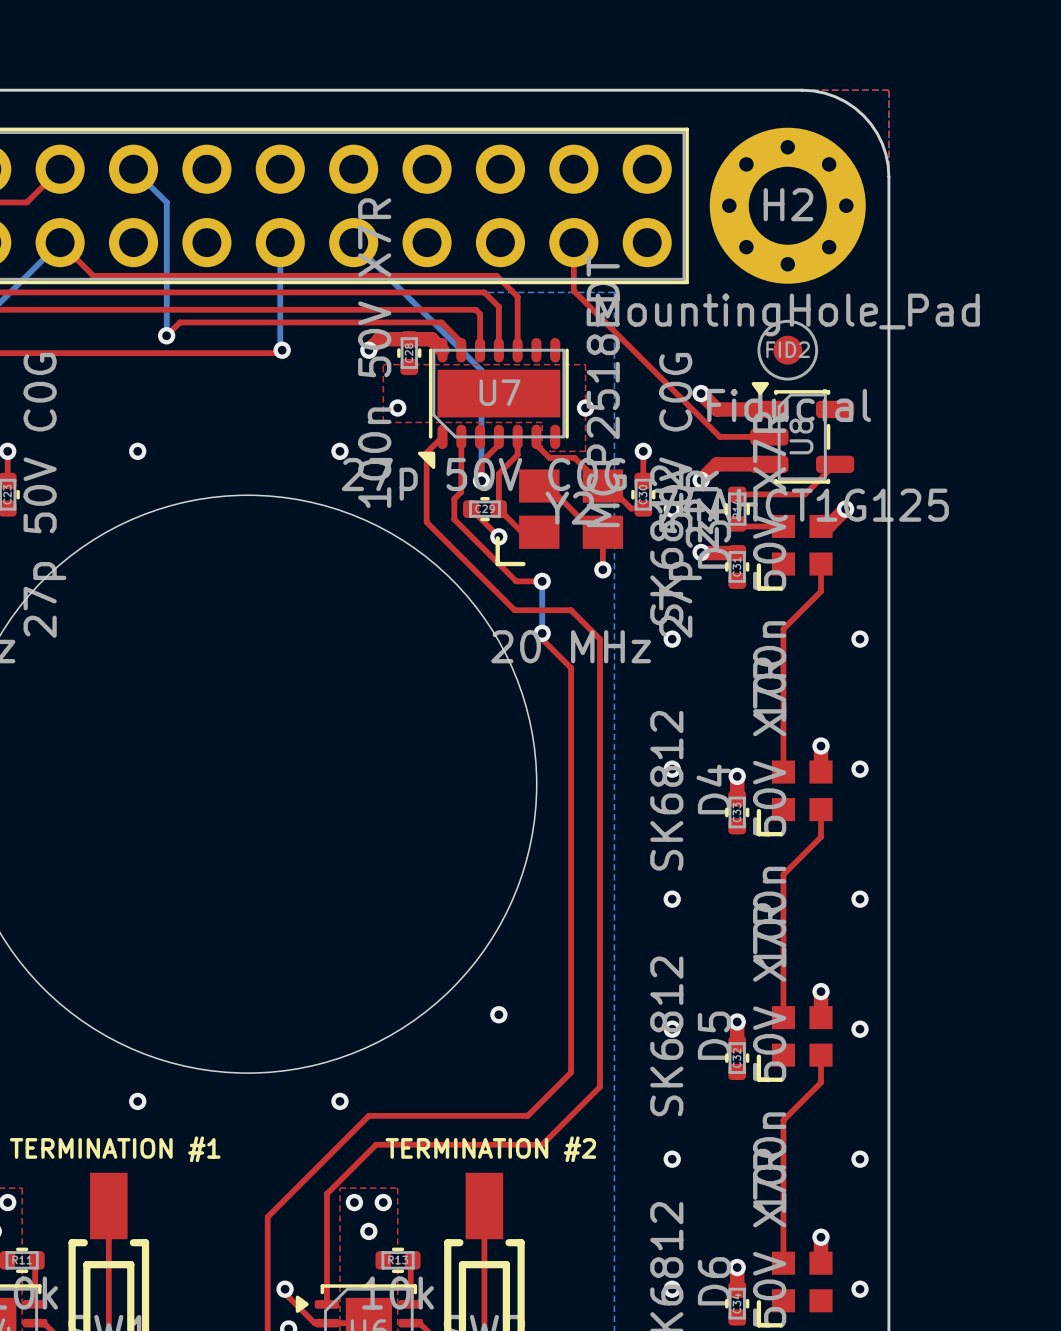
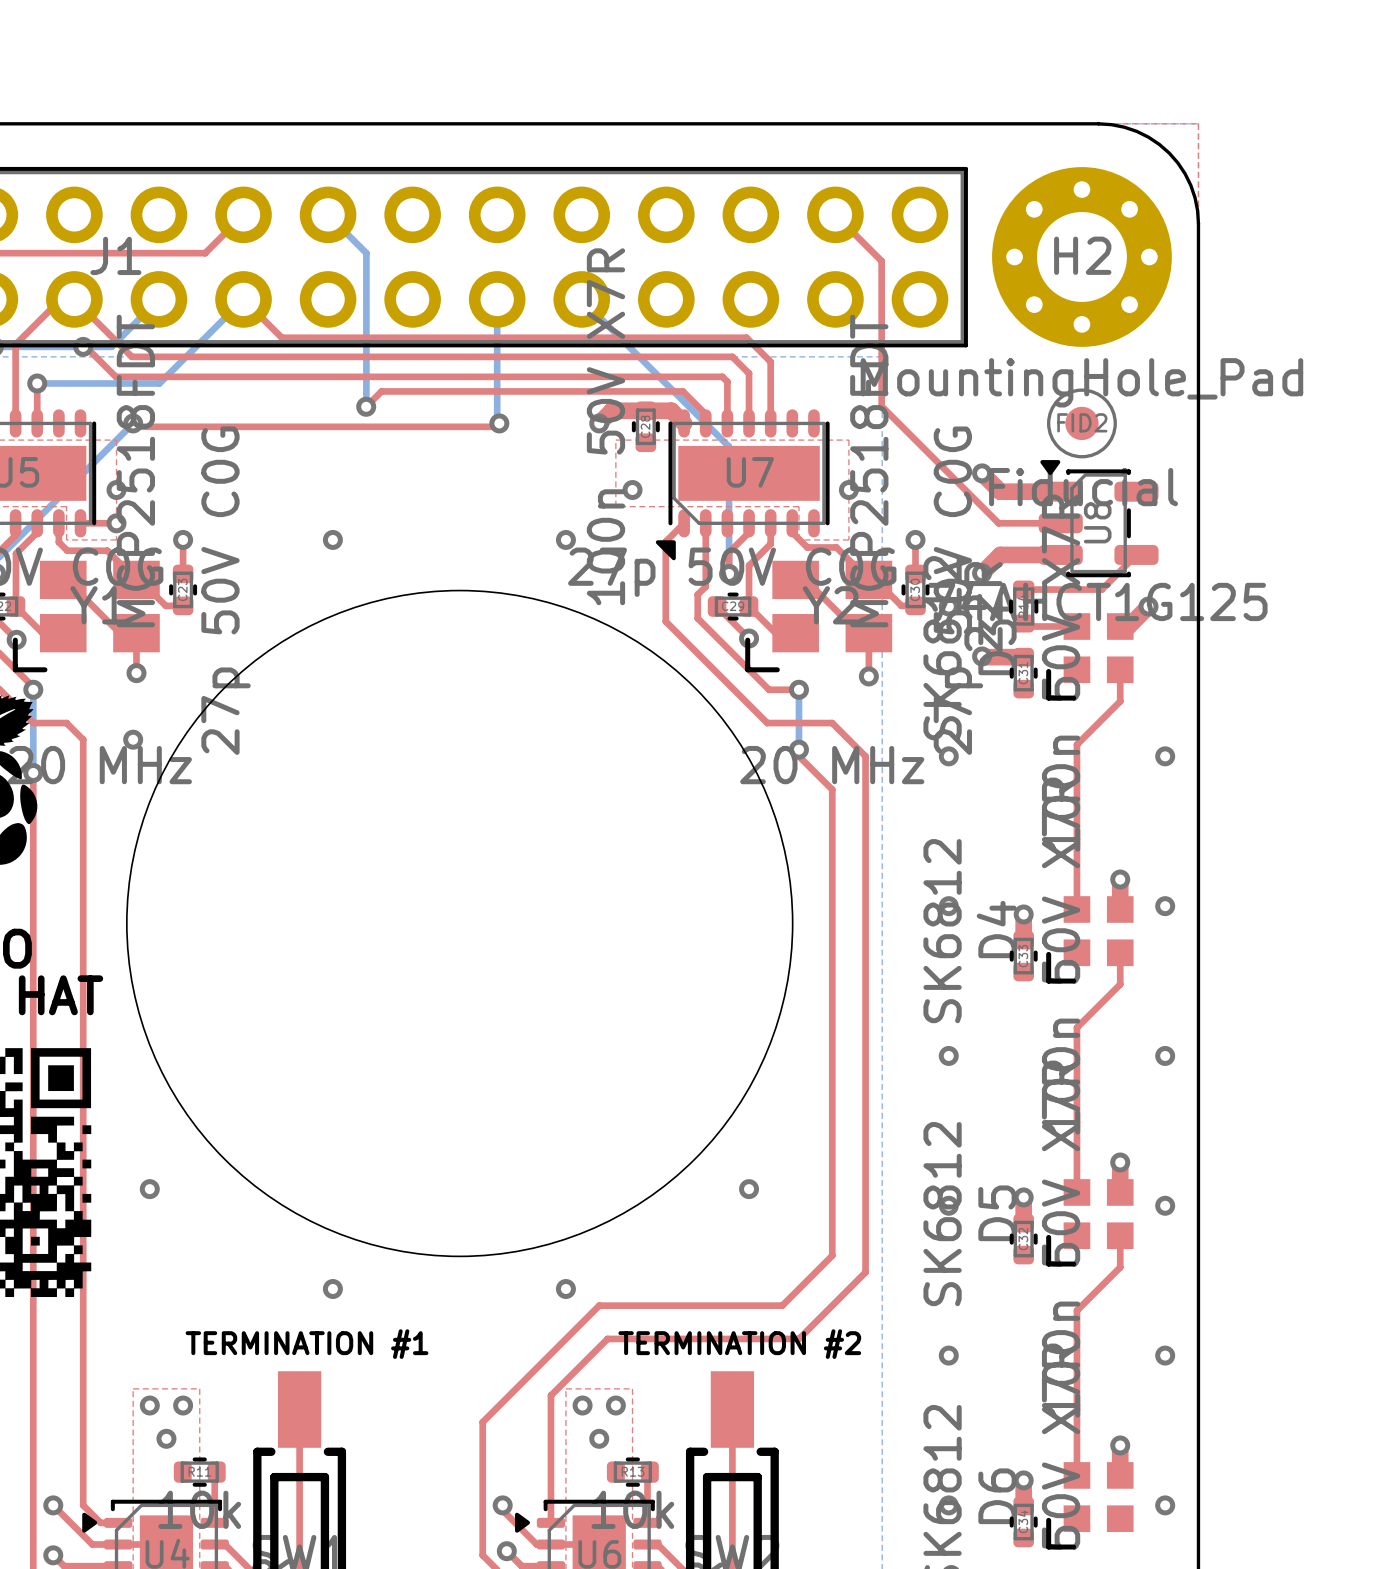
top track: (573, 242) (573, 290) (719, 436) -> (835, 214) (881, 261) (881, 406) (998, 523) (1003, 523)

